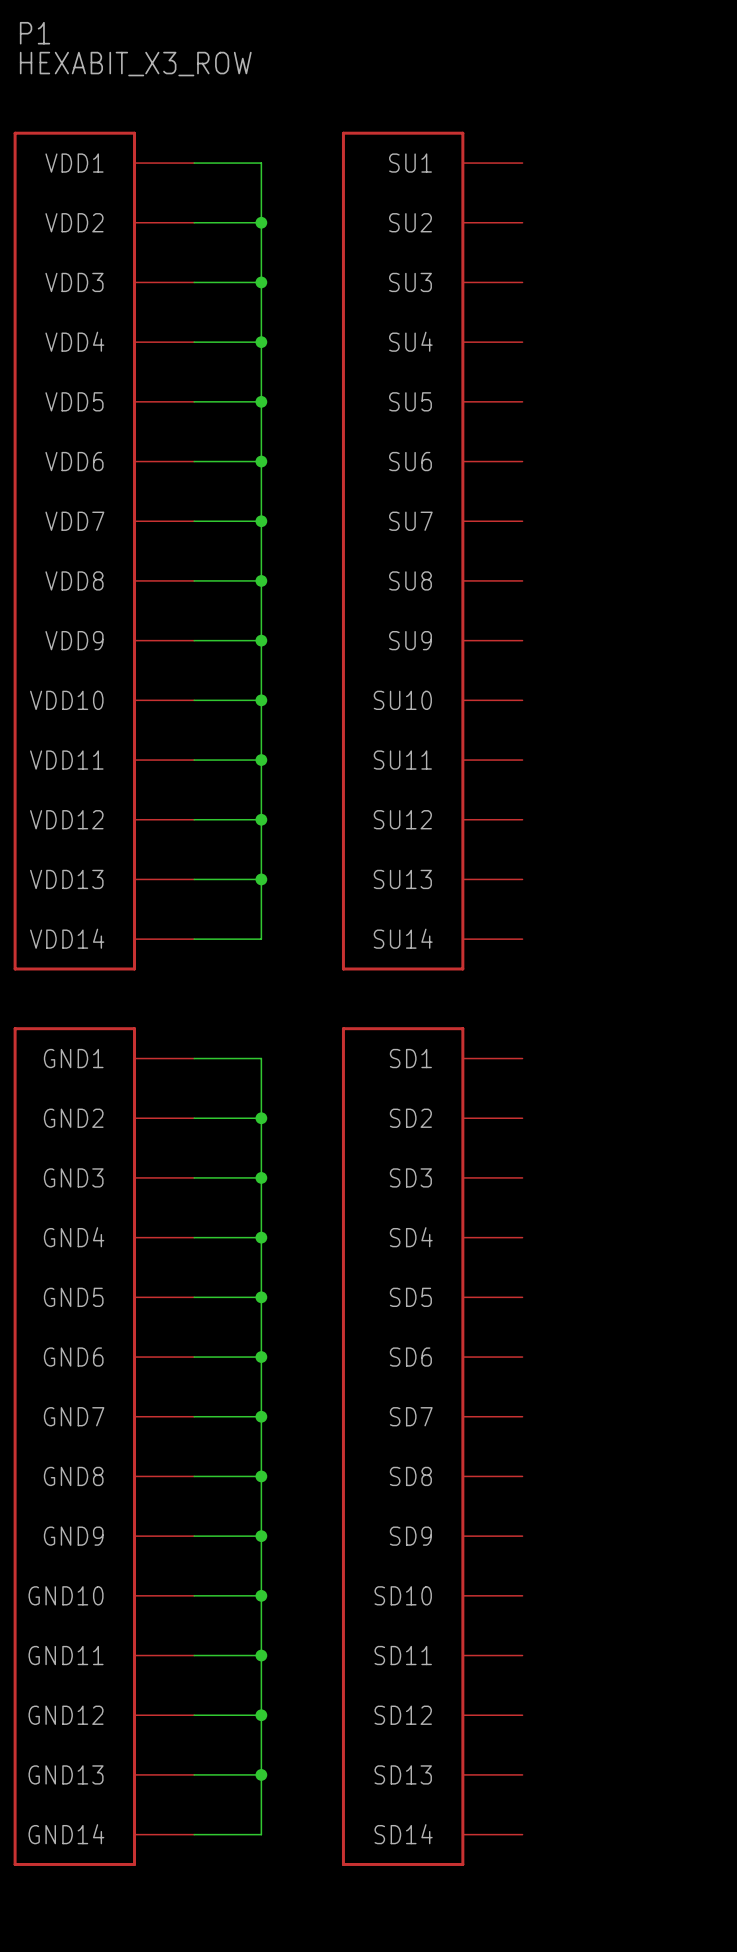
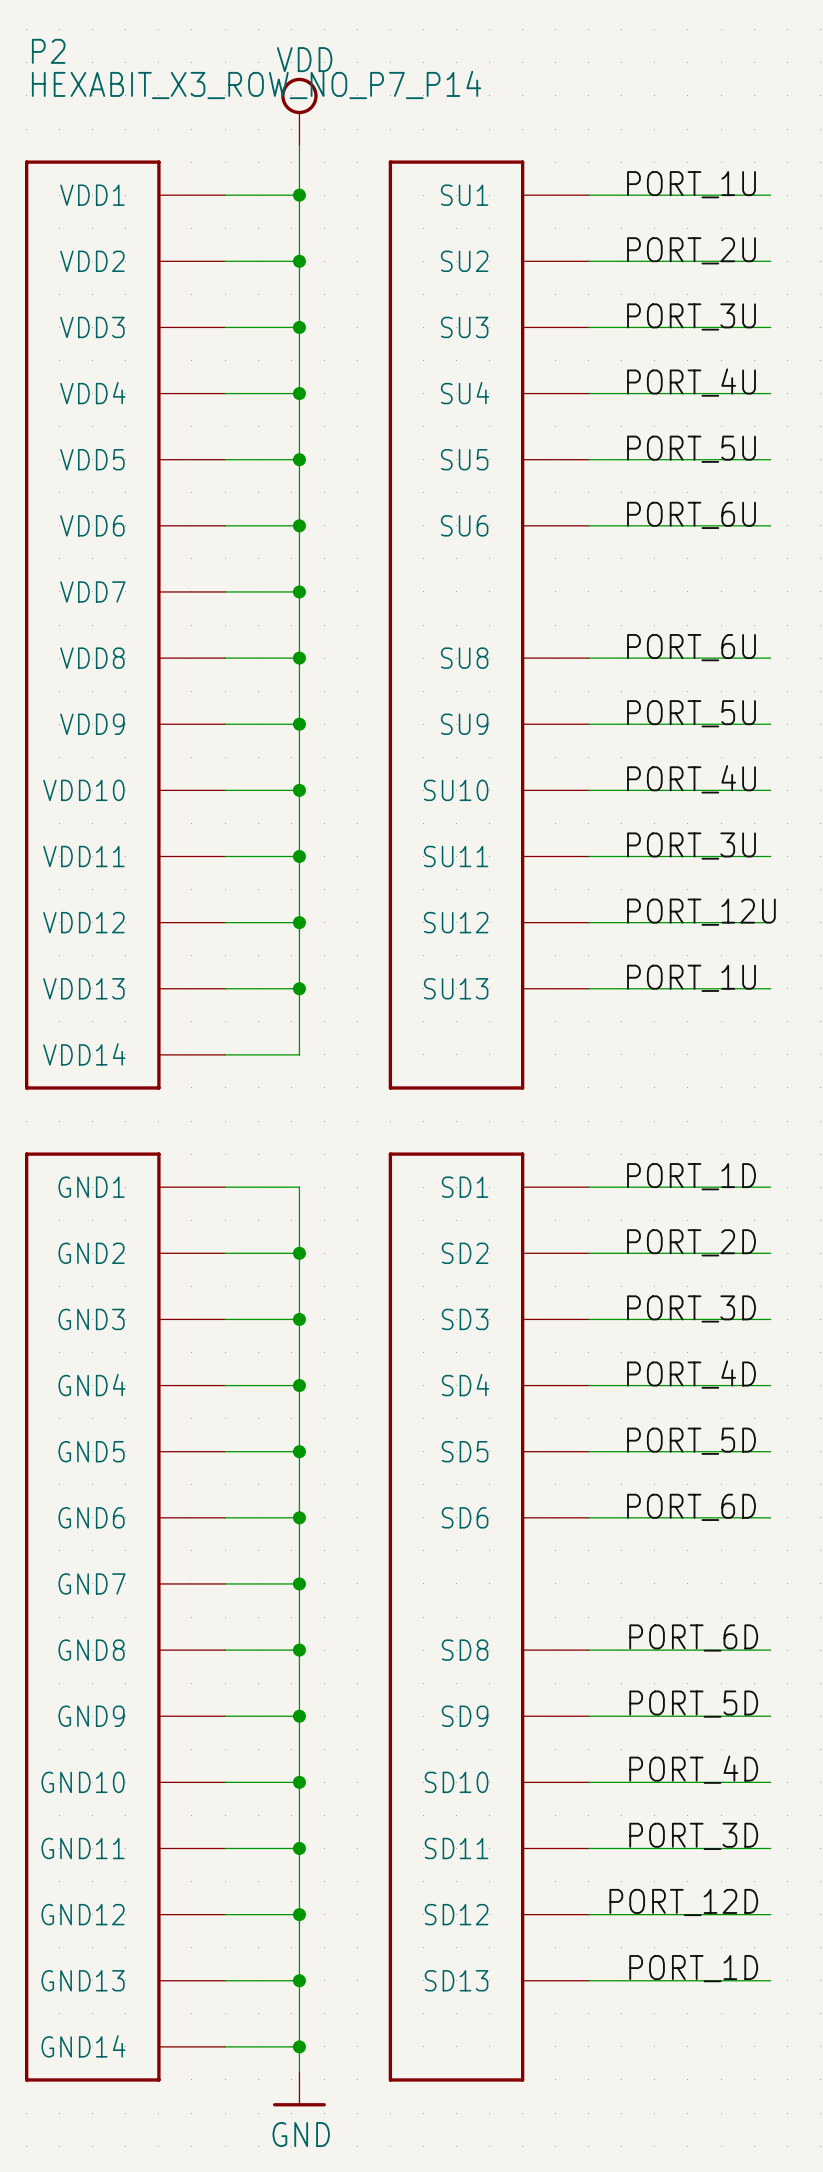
power symbol: none -> VDD (299, 111)
wire: none -> (299, 145) (299, 195)
label: none -> PORT_1U (691, 184)
junction: none -> (299, 195)
wire: none -> (588, 195) (770, 195)
label: none -> PORT_2U (691, 250)
wire: none -> (588, 261) (770, 261)
label: none -> PORT_3U (691, 316)
wire: none -> (588, 327) (770, 327)
label: none -> PORT_4U (691, 382)
wire: none -> (588, 393) (770, 393)
label: none -> PORT_5U (691, 449)
wire: none -> (588, 459) (770, 459)
label: none -> PORT_6U (691, 515)
wire: none -> (588, 525) (770, 525)
label: none -> PORT_6U (691, 647)
wire: none -> (588, 658) (770, 658)
label: none -> PORT_5U (691, 713)
wire: none -> (588, 724) (770, 724)
label: none -> PORT_4U (691, 779)
wire: none -> (588, 790) (770, 790)
label: none -> PORT_3U (691, 846)
wire: none -> (588, 856) (770, 856)
label: none -> PORT_12U (701, 912)
wire: none -> (588, 922) (770, 922)
label: none -> PORT_1U (691, 978)
wire: none -> (588, 988) (770, 988)
P1: HEXABIT_X3_ROW (268, 998) -> none
P2: none -> HEXABIT_X3_ROW_NO_P7_P14 (306, 1121)
label: none -> PORT_1D (691, 1176)
wire: none -> (588, 1187) (770, 1187)
label: none -> PORT_2D (691, 1242)
wire: none -> (588, 1253) (770, 1253)
label: none -> PORT_3D (691, 1308)
wire: none -> (588, 1319) (770, 1319)
label: none -> PORT_4D (691, 1374)
wire: none -> (588, 1385) (770, 1385)
label: none -> PORT_5D (691, 1441)
wire: none -> (588, 1451) (770, 1451)
label: none -> PORT_6D (691, 1507)
wire: none -> (588, 1517) (770, 1517)
label: none -> PORT_6D (693, 1637)
wire: none -> (588, 1650) (770, 1650)
label: none -> PORT_5D (693, 1704)
wire: none -> (588, 1716) (770, 1716)
label: none -> PORT_4D (693, 1769)
wire: none -> (588, 1782) (770, 1782)
label: none -> PORT_3D (693, 1836)
wire: none -> (588, 1848) (770, 1848)
label: none -> PORT_12D (683, 1902)
wire: none -> (588, 1914) (770, 1914)
label: none -> PORT_1D (693, 1968)
wire: none -> (588, 1980) (770, 1980)
wire: none -> (299, 2046) (299, 2071)
junction: none -> (299, 2046)
power symbol: none -> GND (299, 2089)

